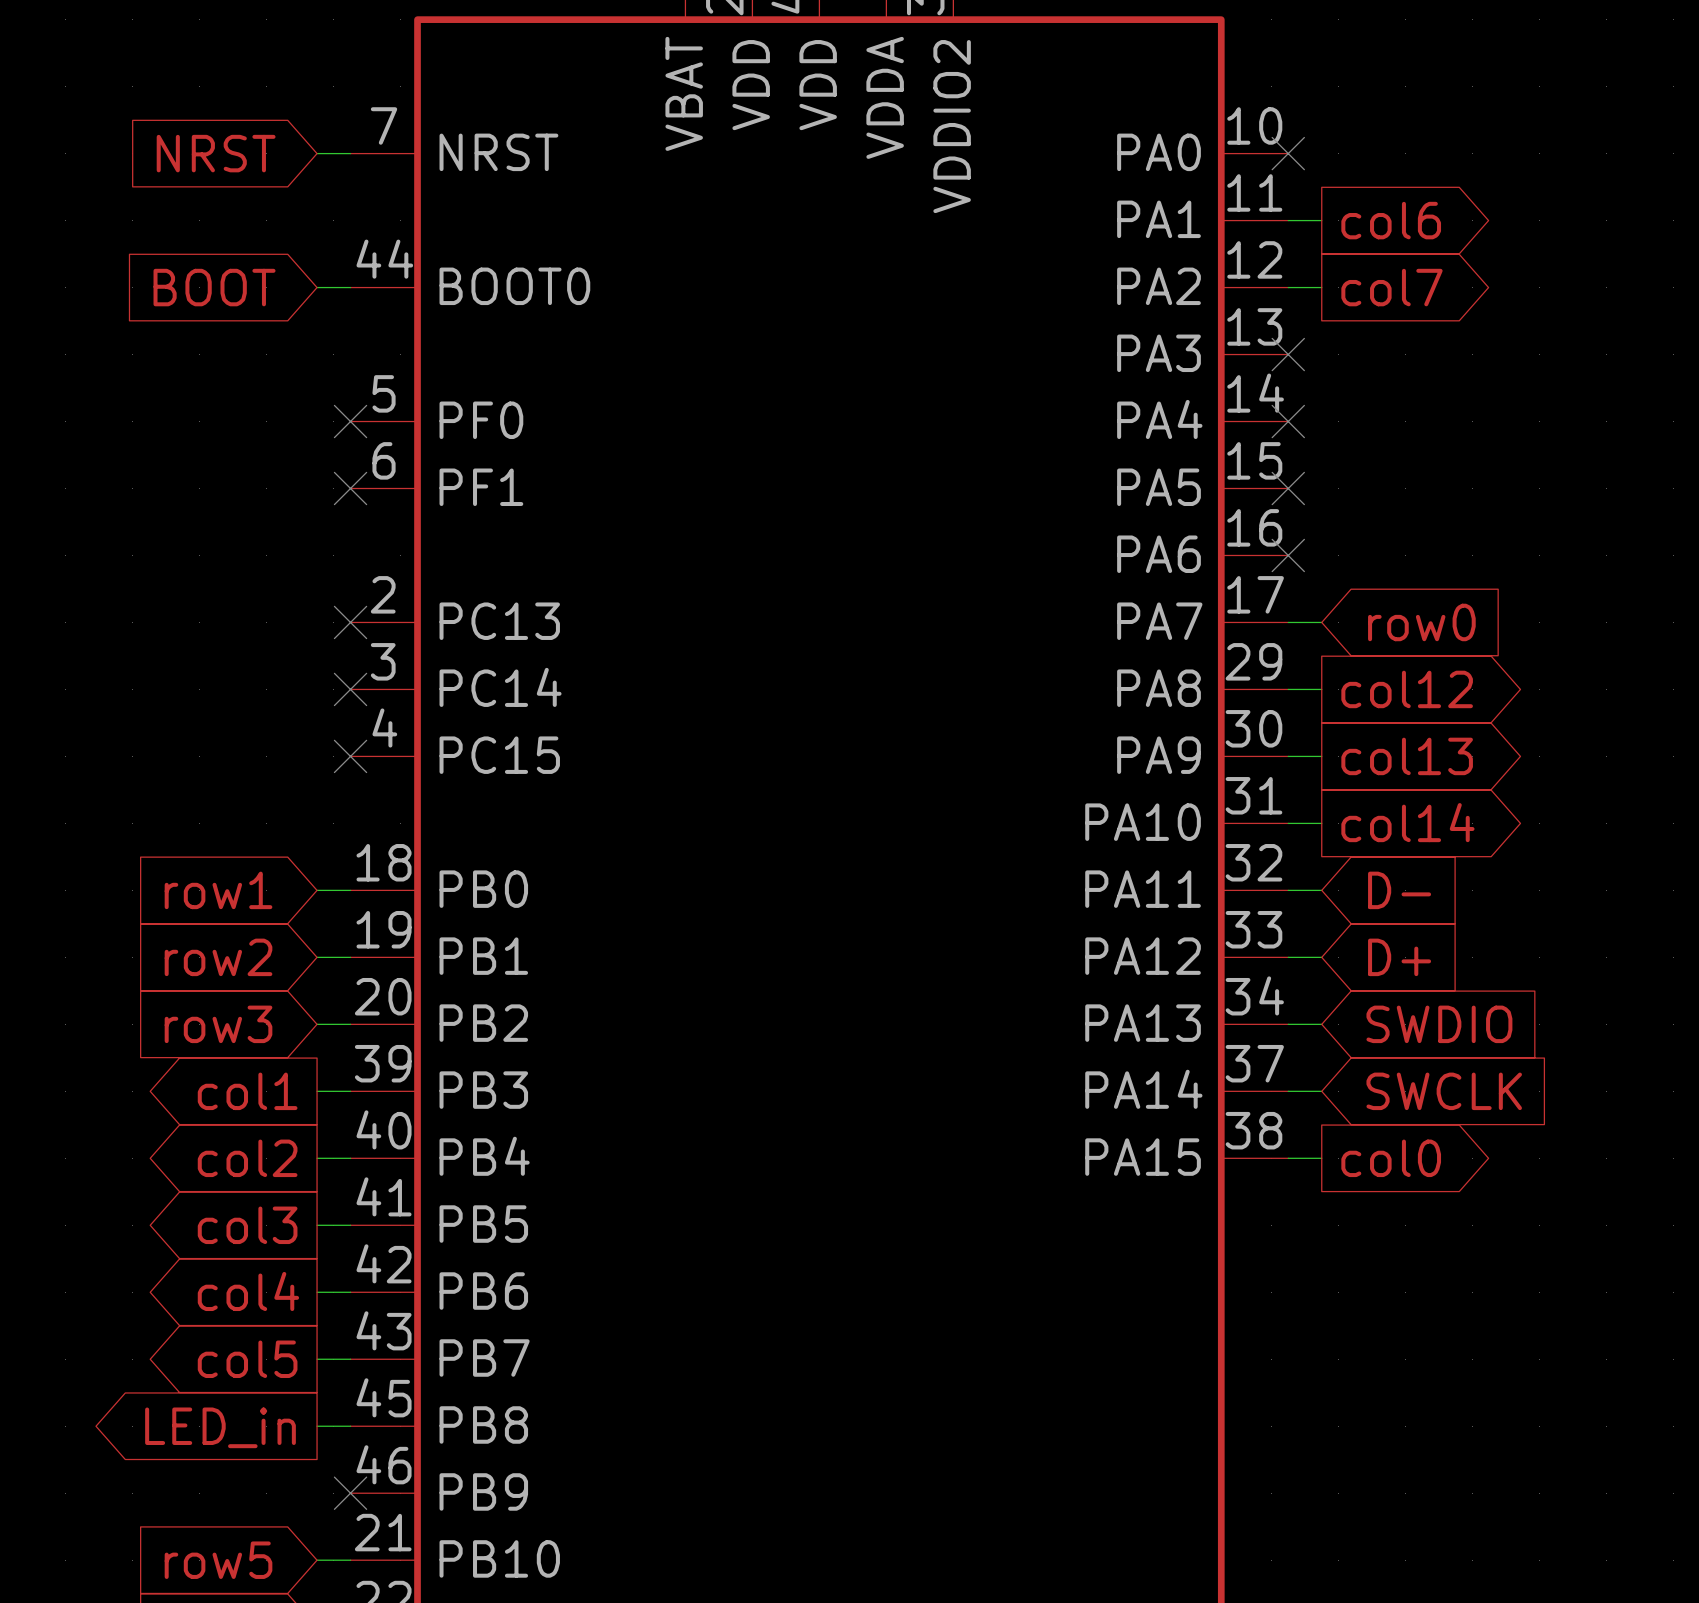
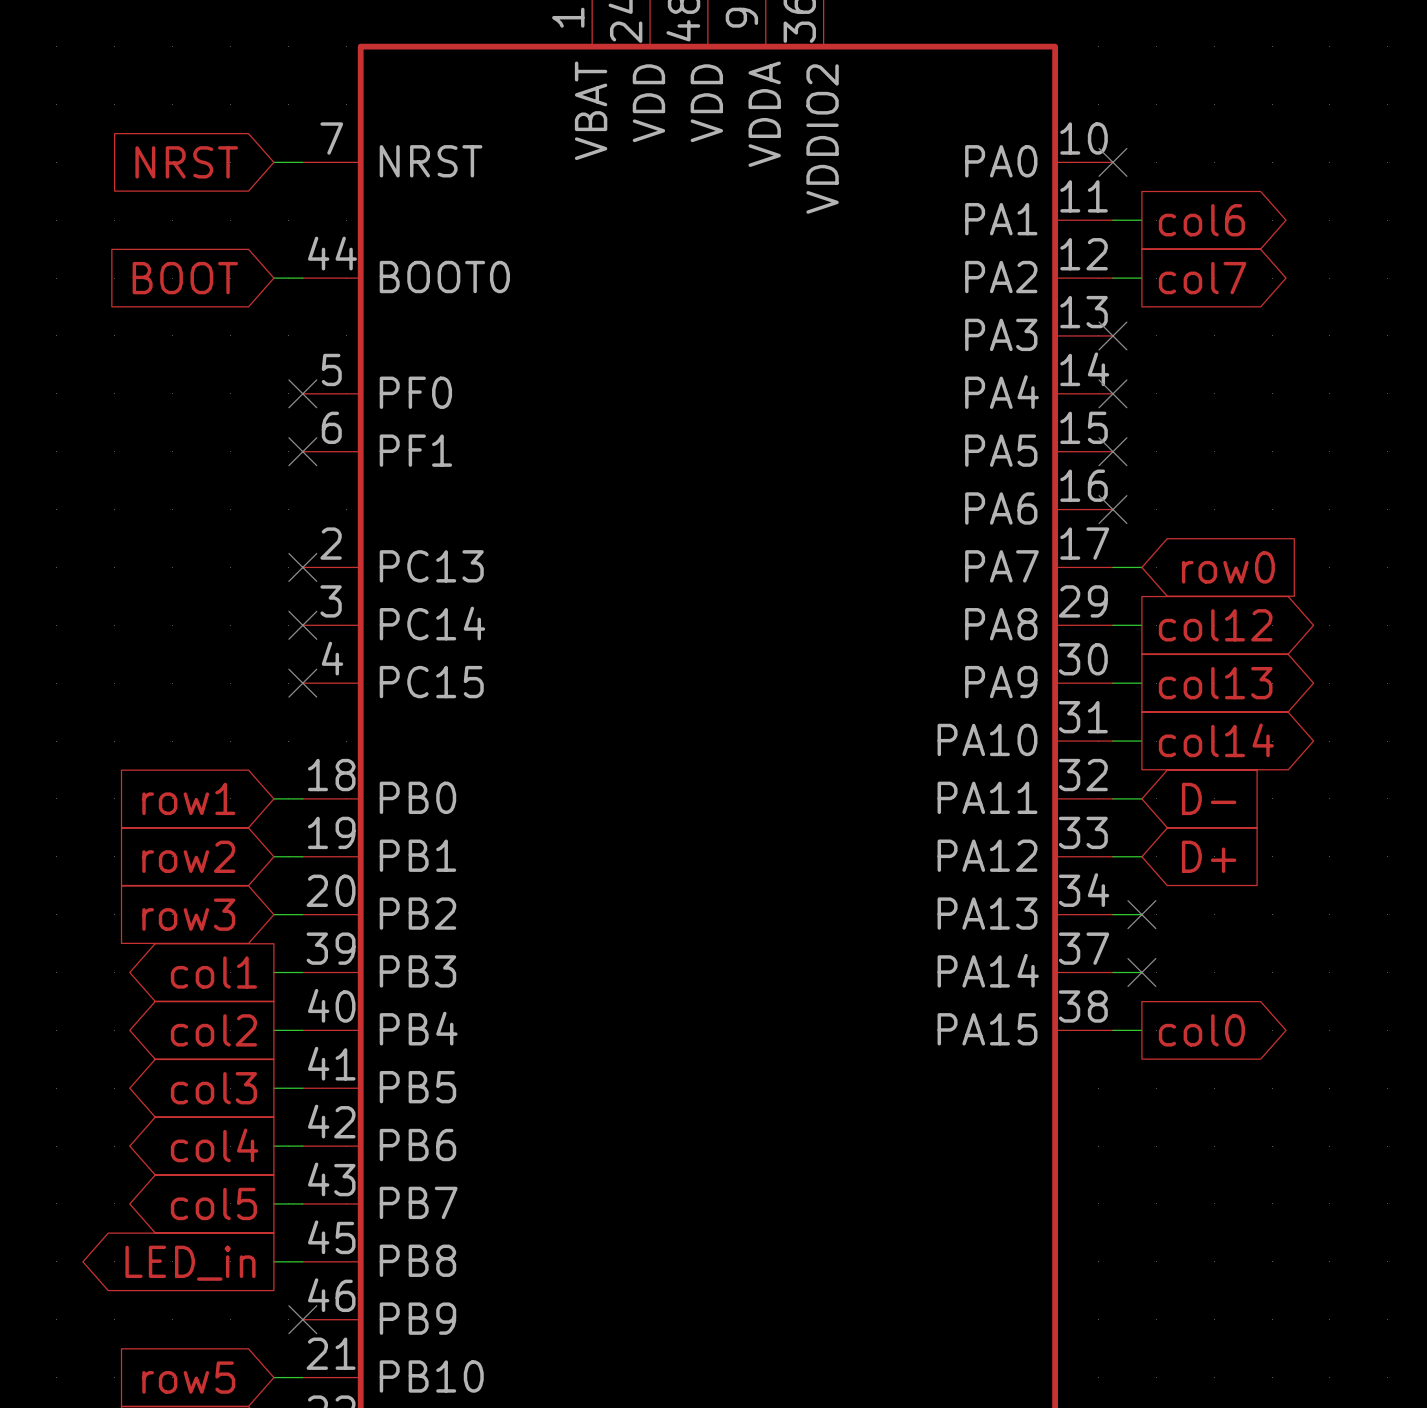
no-connect mark: none -> (1141, 914)
global label: SWDIO (1439, 1024) -> none
no-connect mark: none -> (1141, 972)
global label: SWCLK (1444, 1091) -> none

